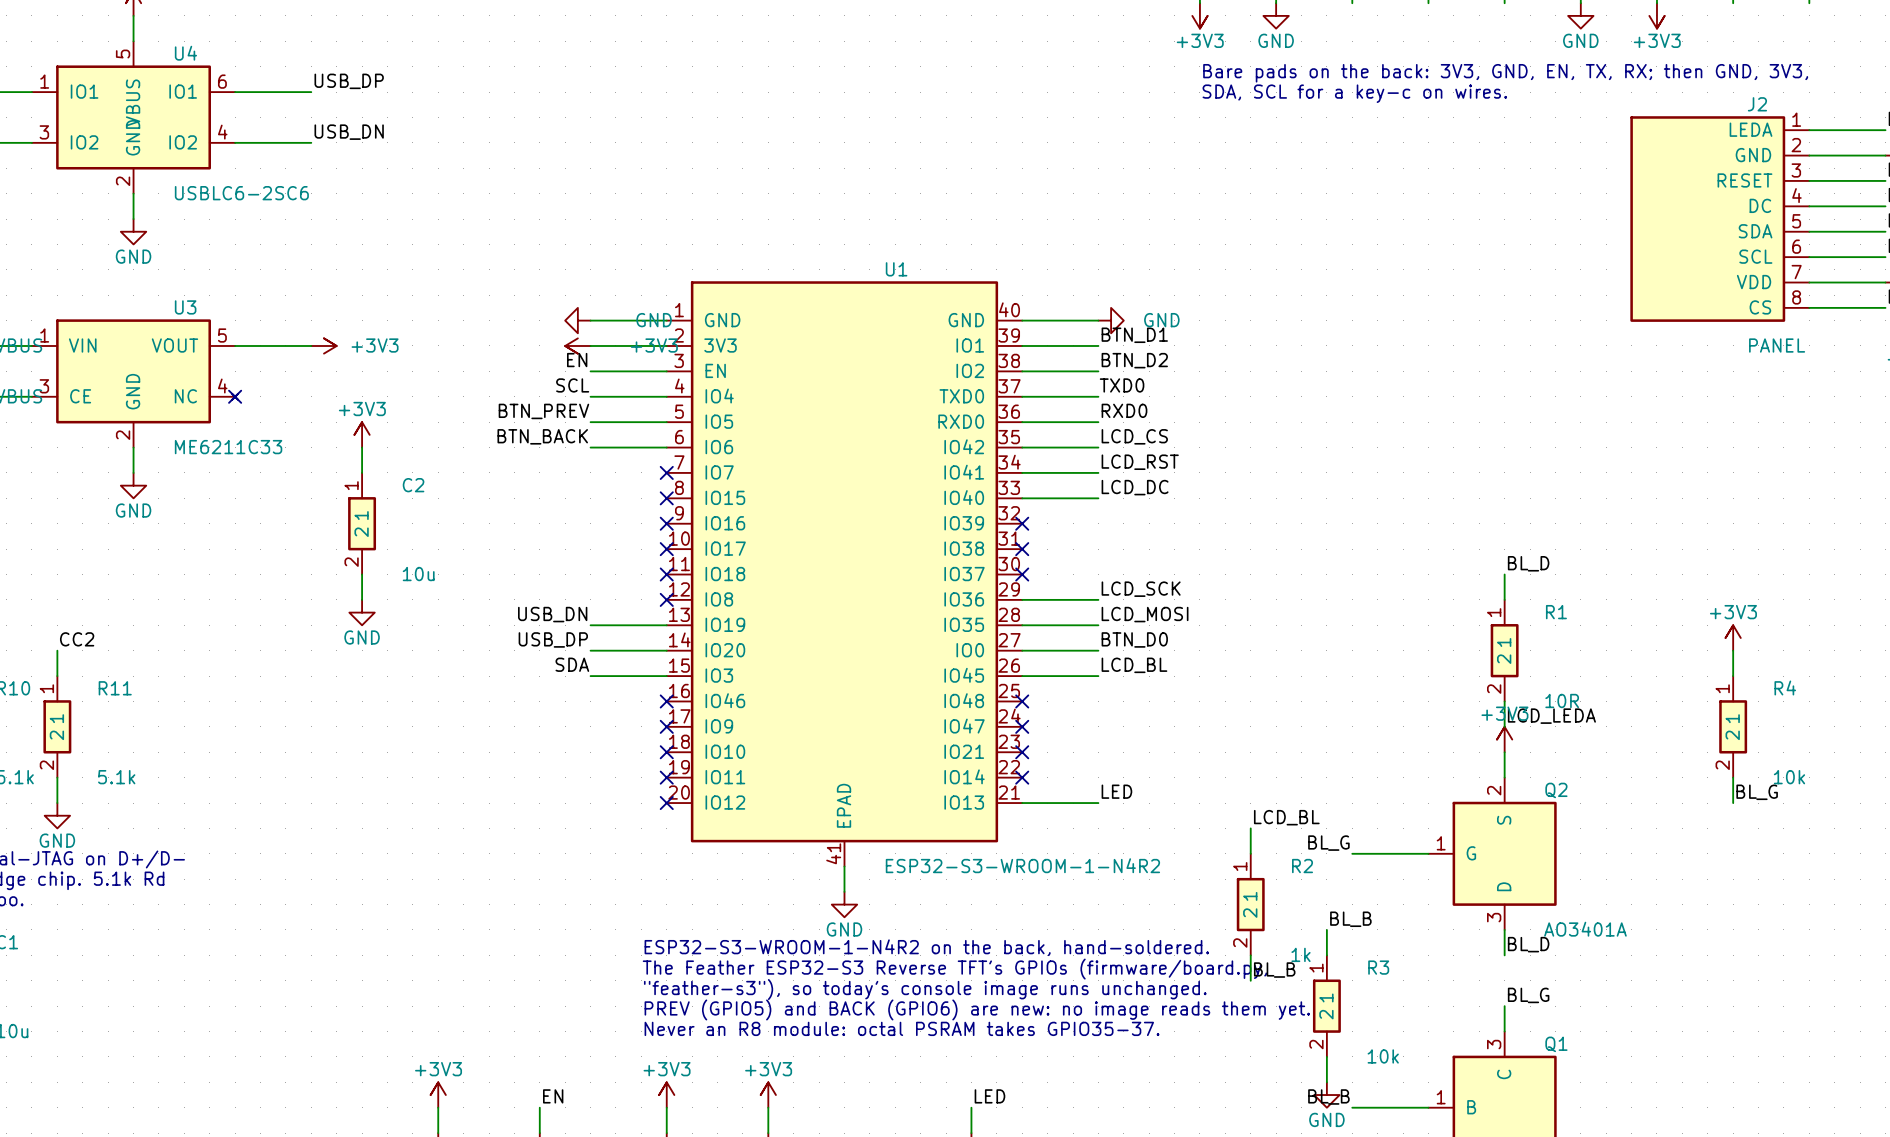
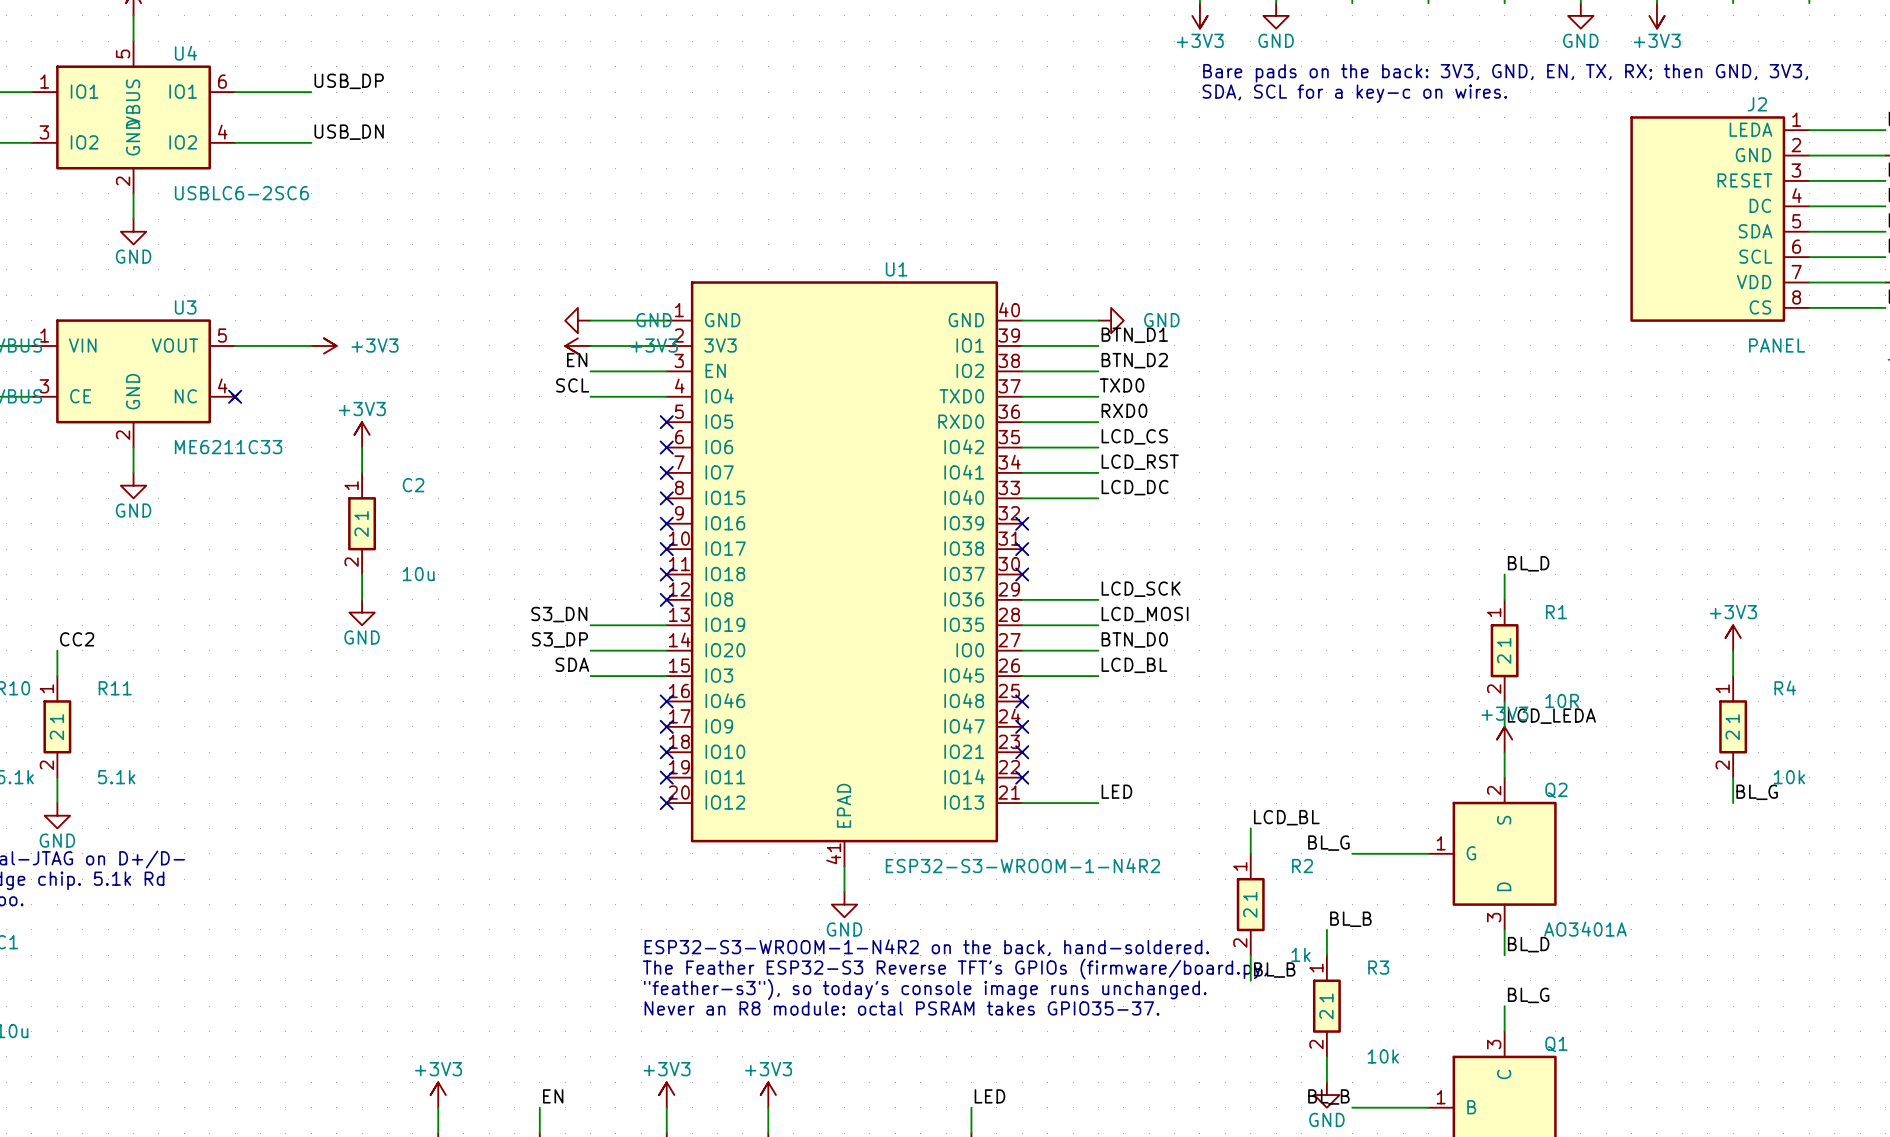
label: BTN_PREV (543, 411) -> none
wire: (590, 422) (666, 422) -> none
no-connect mark: none -> (666, 422)
label: BTN_BACK (542, 436) -> none
wire: (590, 447) (666, 447) -> none
no-connect mark: none -> (666, 447)
label: USB_DN (552, 614) -> S3_DN (559, 614)
label: USB_DP (553, 639) -> S3_DP (559, 639)
text: PREV (GPIO5) and BACK (GPIO6) are new: no image reads them yet. (977, 1009) -> Never an R8 module: octal PSRAM takes GPIO35-37. (902, 1008)
text: Never an R8 module: octal PSRAM takes GPIO35-37. (902, 1028) -> none

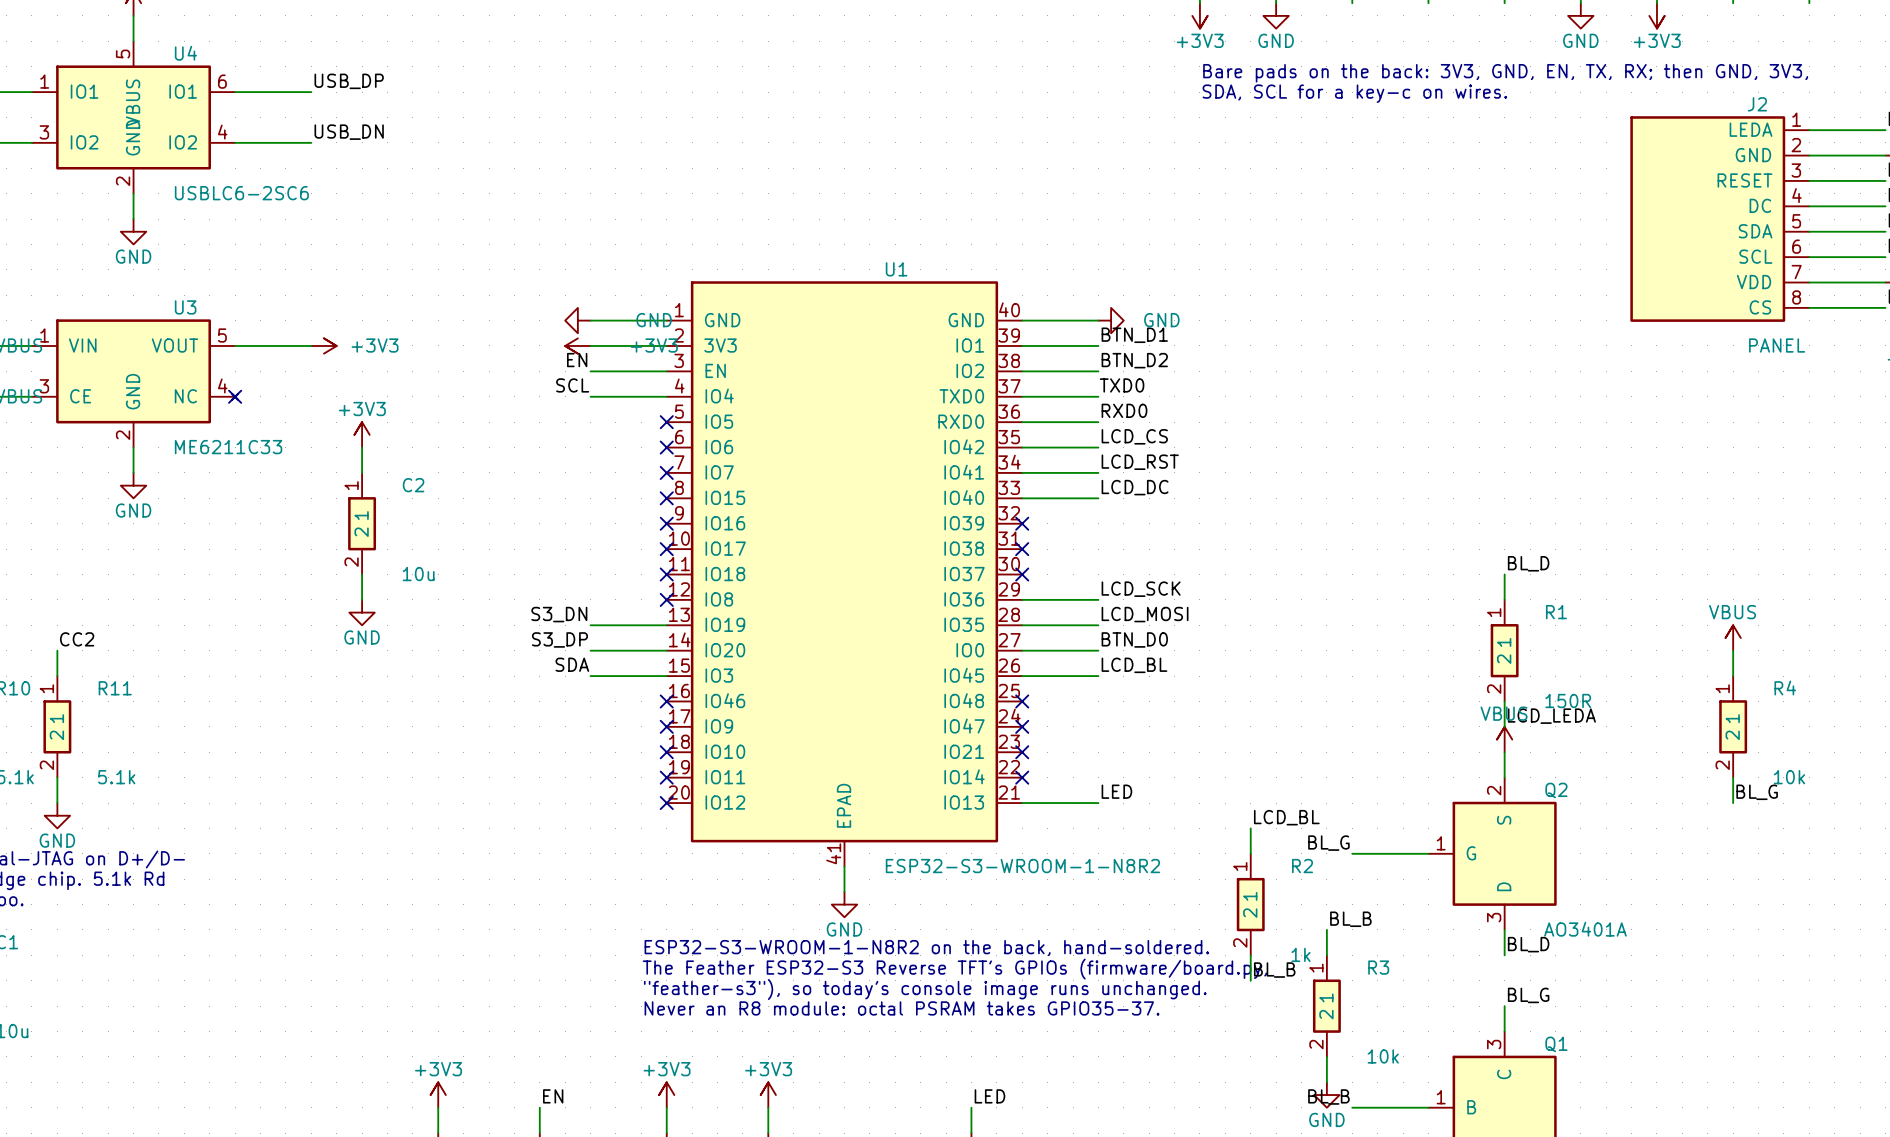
power symbol: +3V3 (1733, 637) -> VBUS (1733, 637)
R1 value: 10R (1562, 700) -> 150R (1568, 700)
power symbol: +3V3 (1504, 739) -> VBUS (1504, 739)
U1 value: ESP32-S3-WROOM-1-N4R2 (1022, 865) -> ESP32-S3-WROOM-1-N8R2 (1022, 866)
text: ESP32-S3-WROOM-1-N4R2 on the back, hand-soldered. (926, 947) -> ESP32-S3-WROOM-1-N8R2 on the back, hand-soldered. (926, 948)

